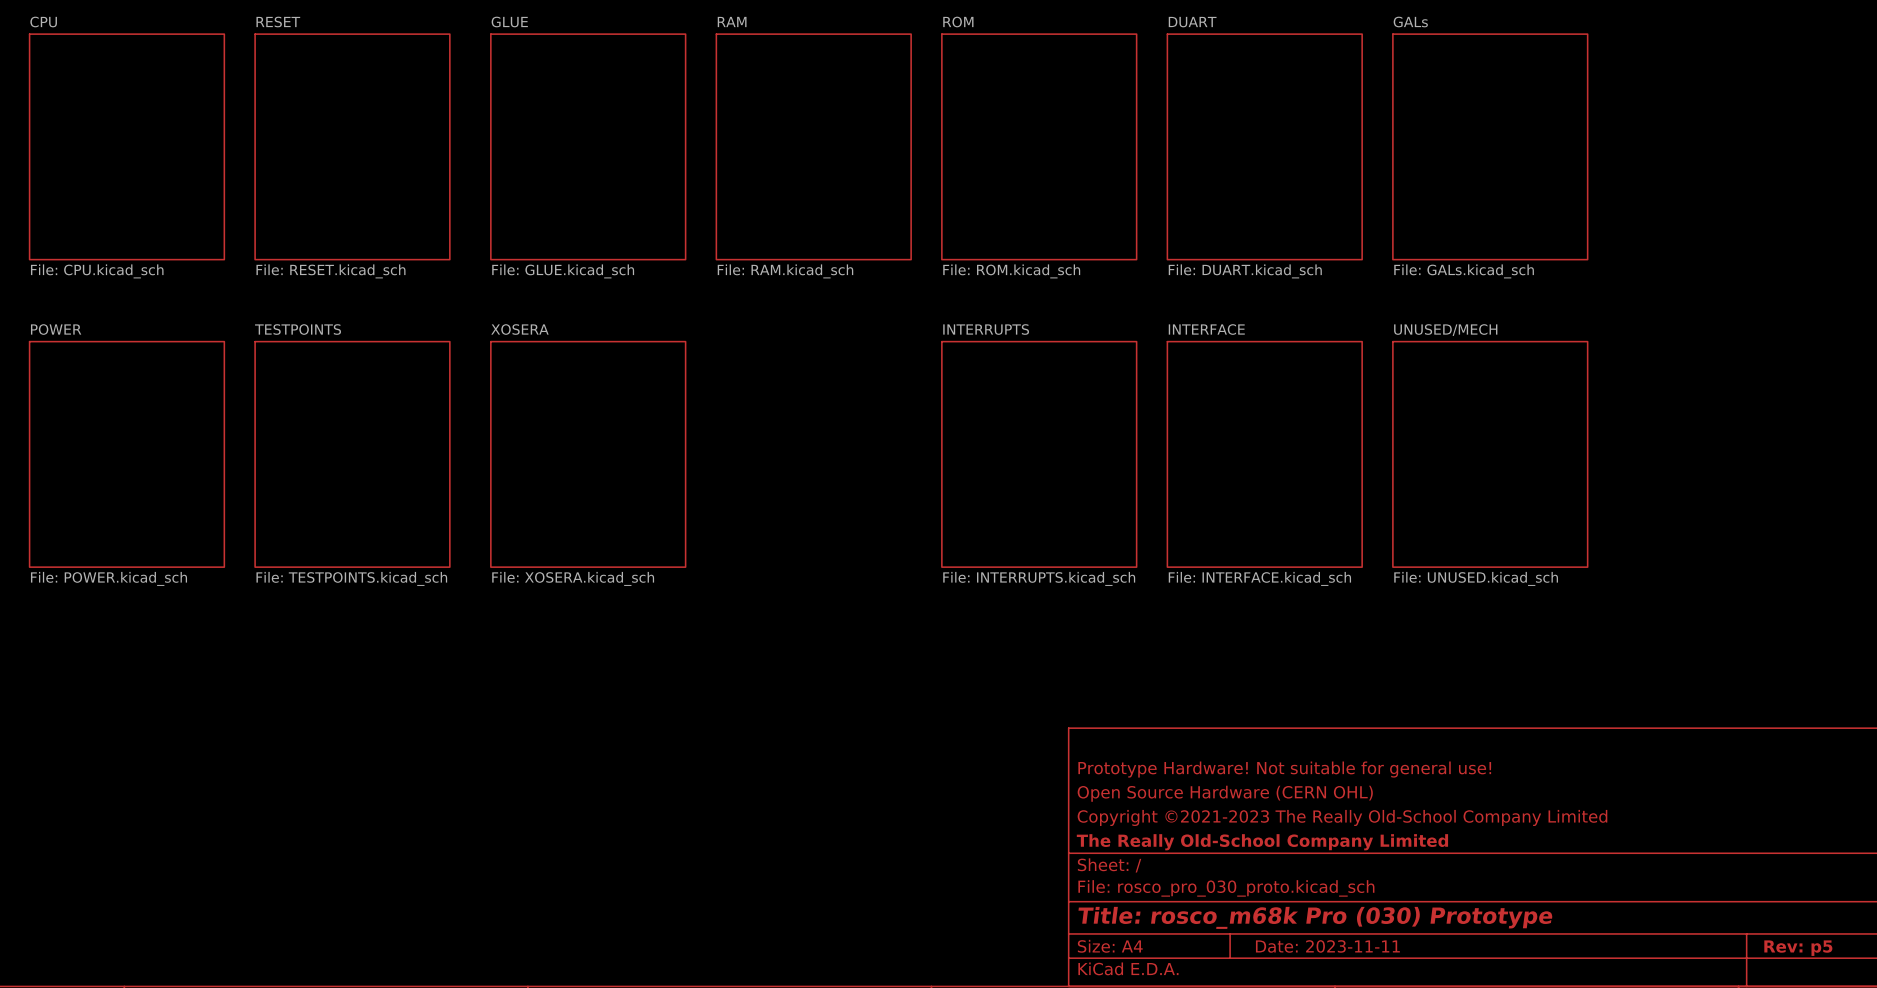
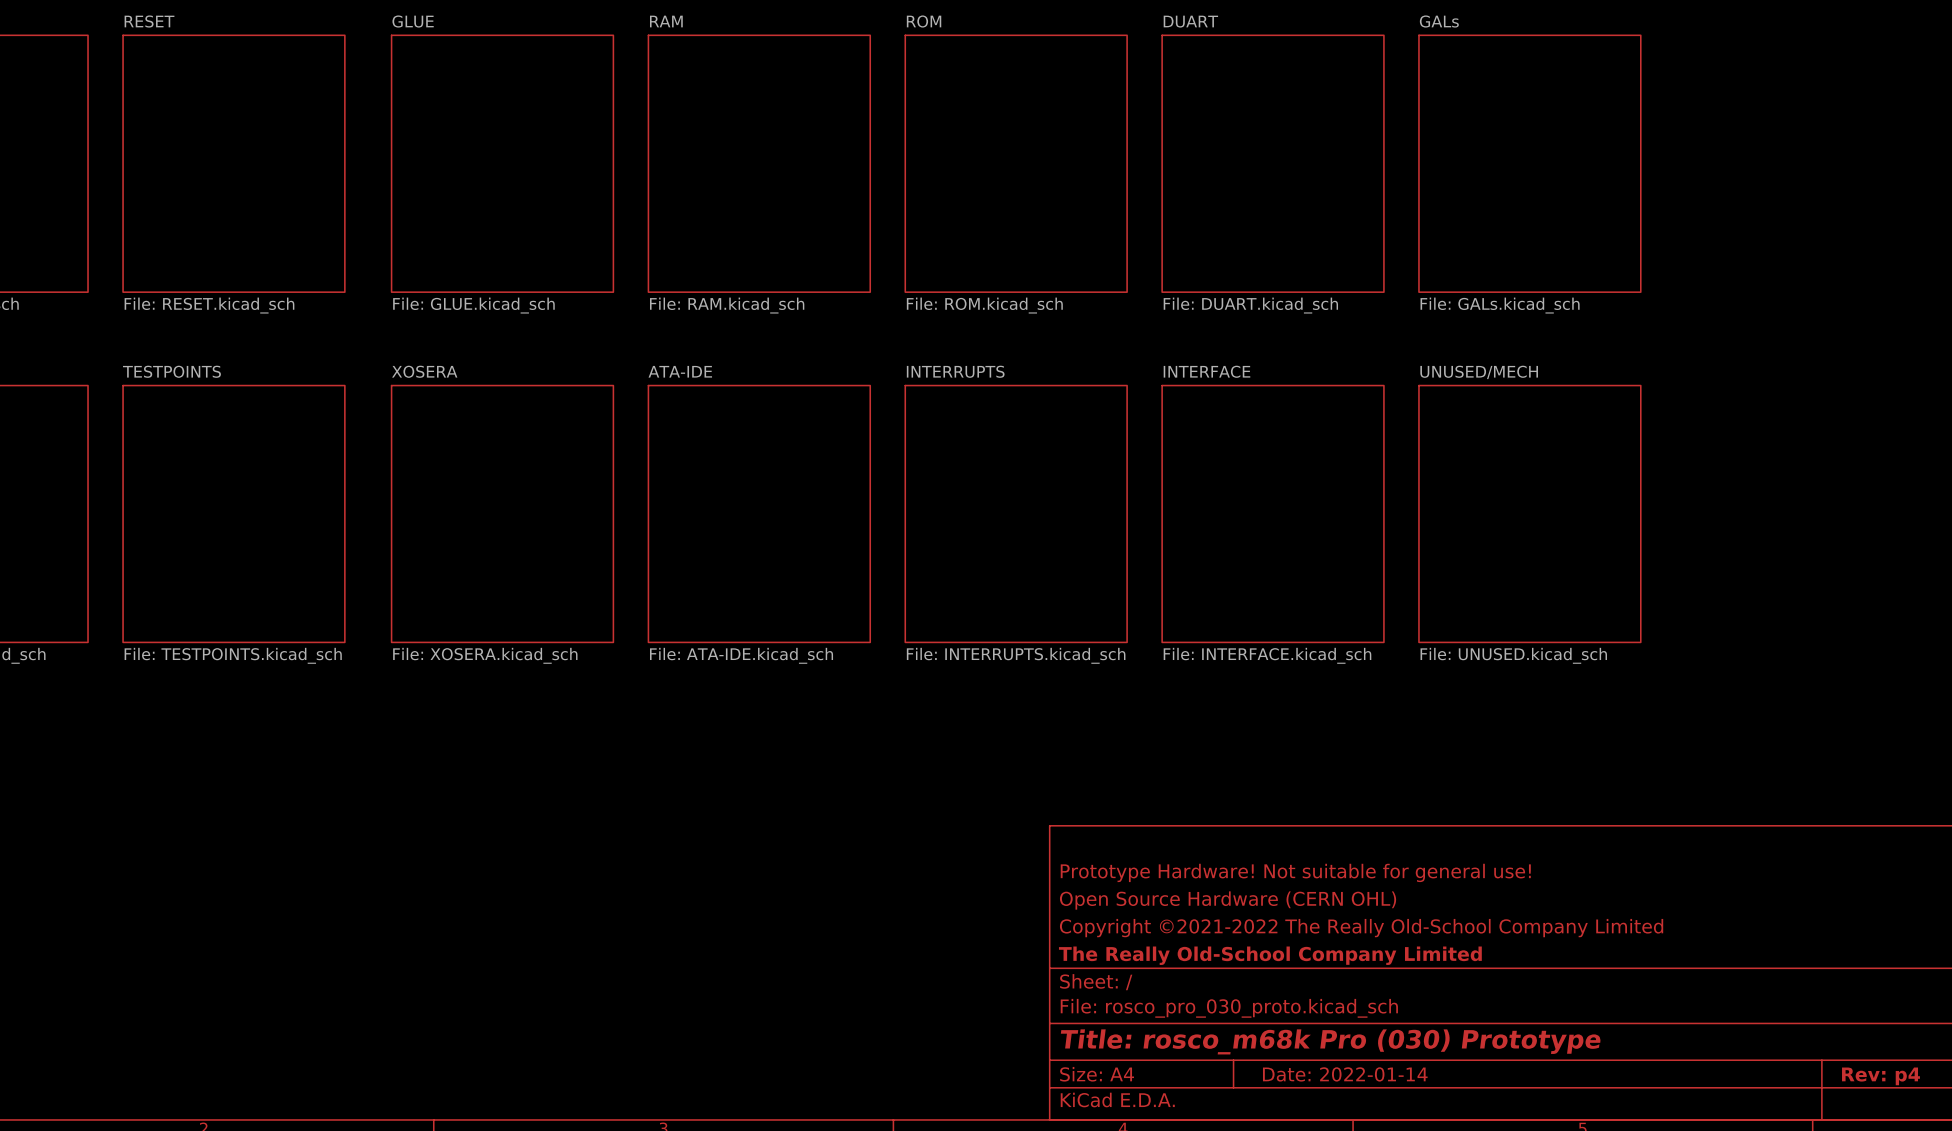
sheet ATA-IDE: none -> File: ATA-IDE.kicad_sch (759, 513)
title block: Copyright ©2021-2023 The Really Old-School Company Limited (1342, 817) -> Copyright ©2021-2022 The Really Old-School Company Limited (1361, 928)
title block: Date: 2023-11-11 (1327, 946) -> Date: 2022-01-14 (1345, 1074)
title block: Rev: p5 (1798, 948) -> Rev: p4 (1880, 1076)

